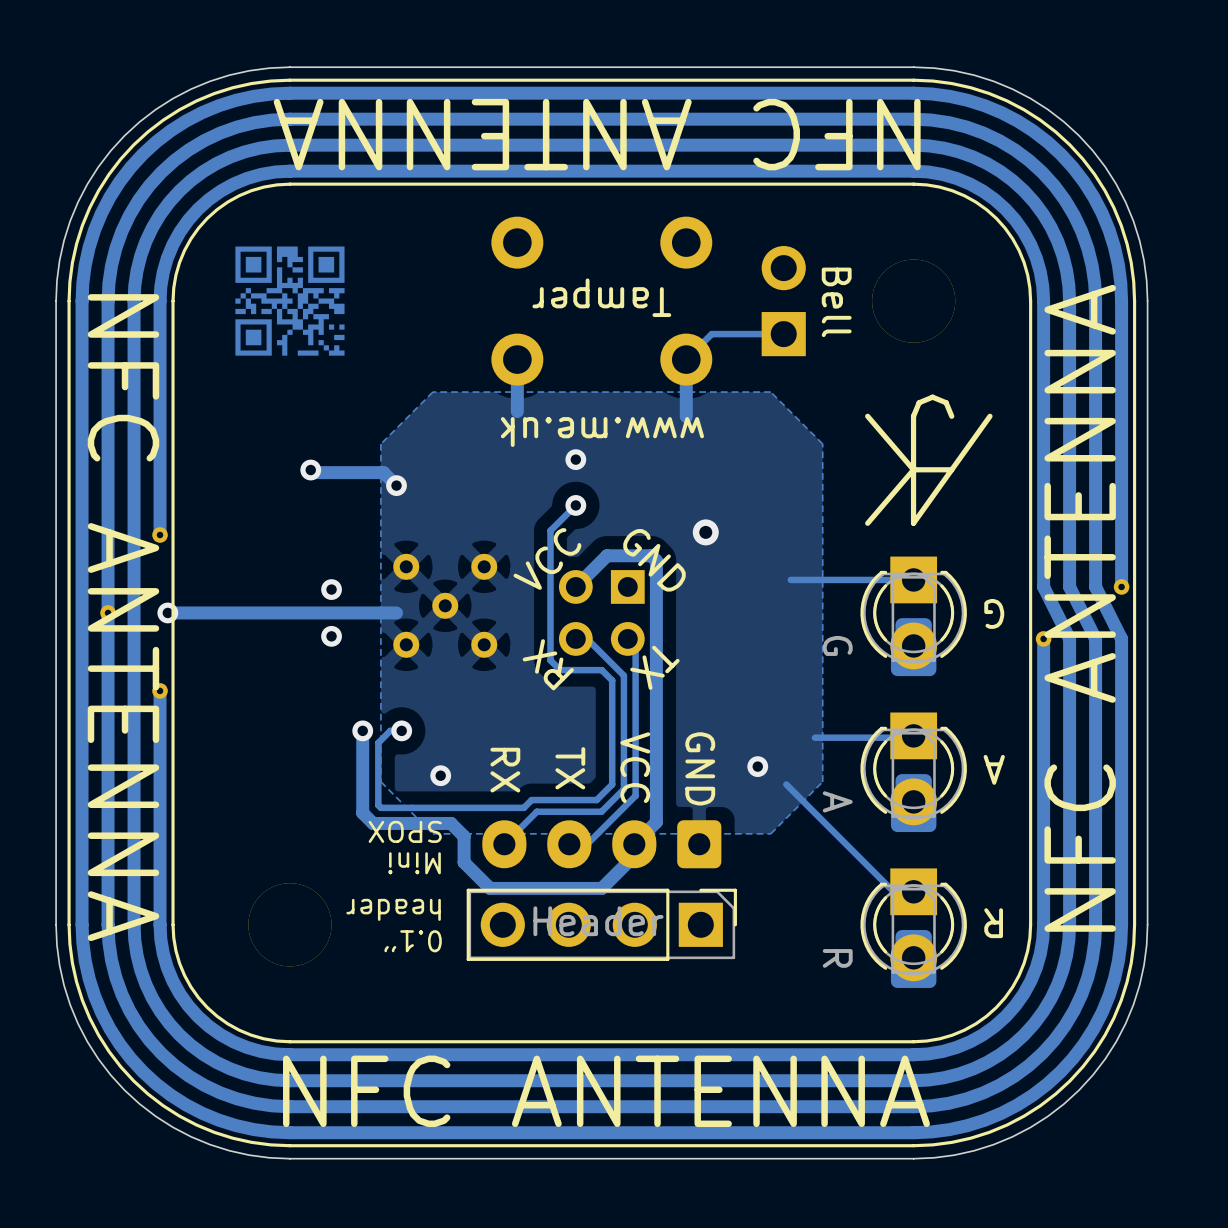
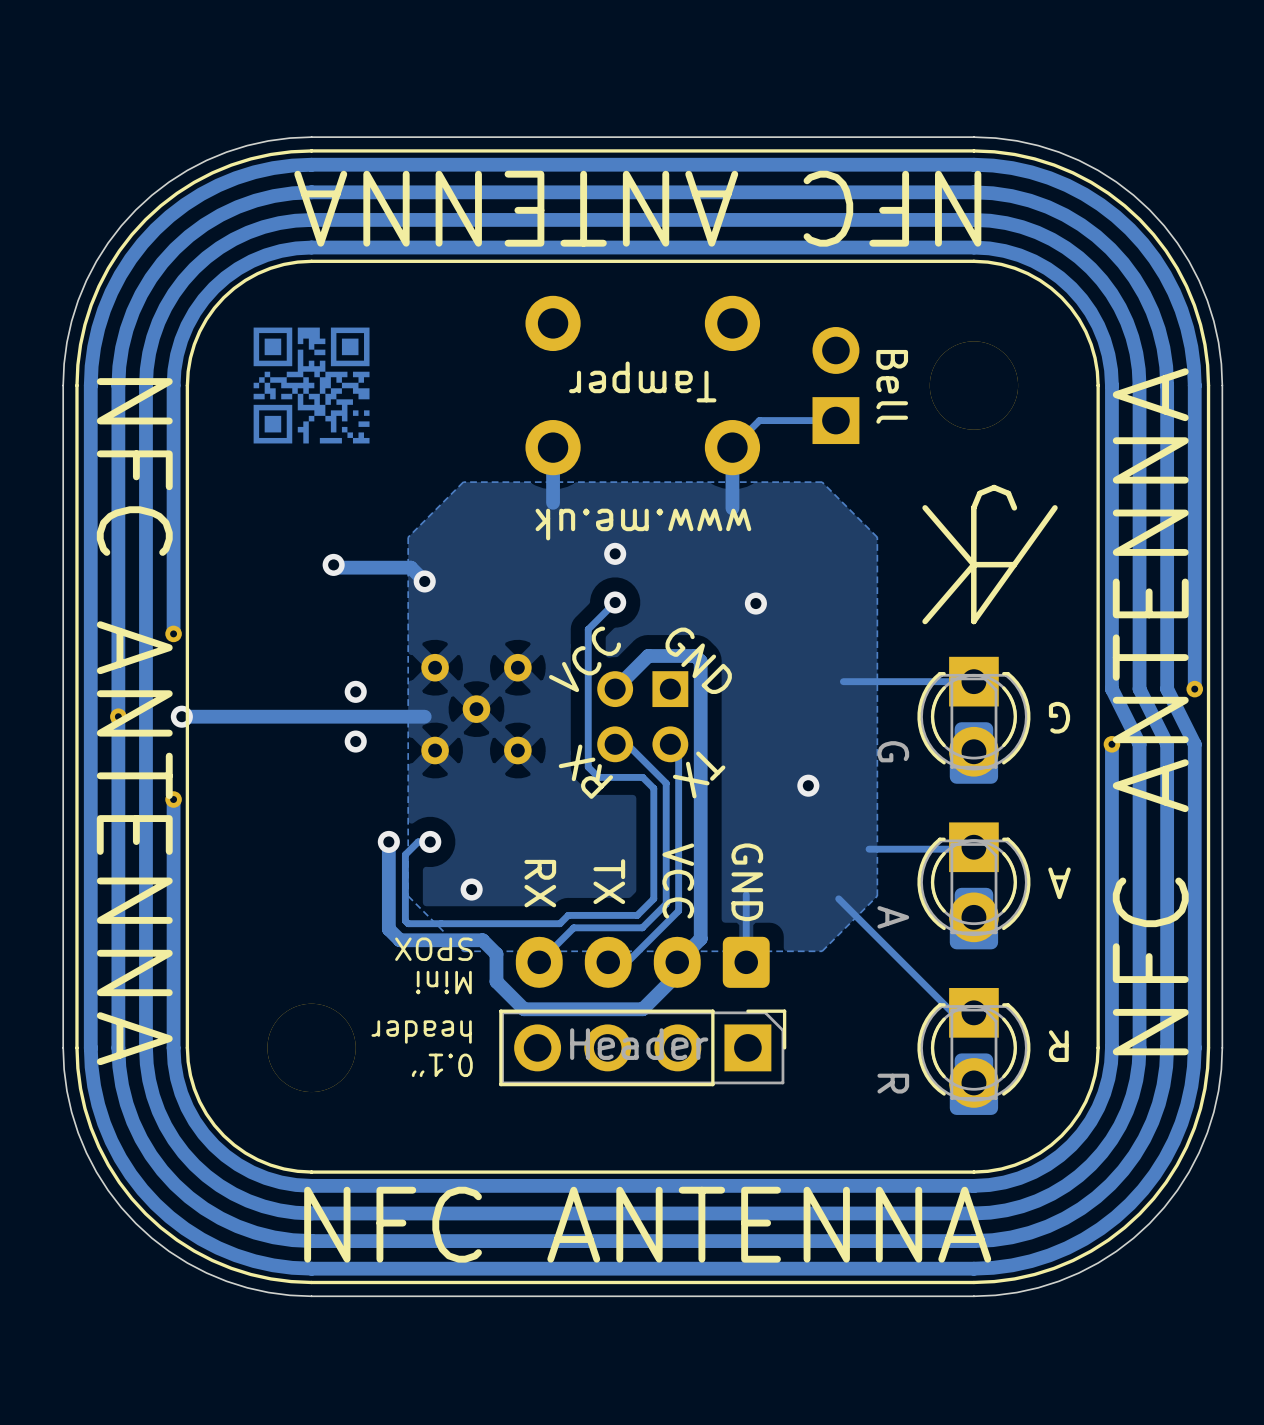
via: none -> (755, 603)
via: (705, 532) -> none
via position: (757, 766) -> (808, 785)
track: none -> (746, 894) (746, 962)

